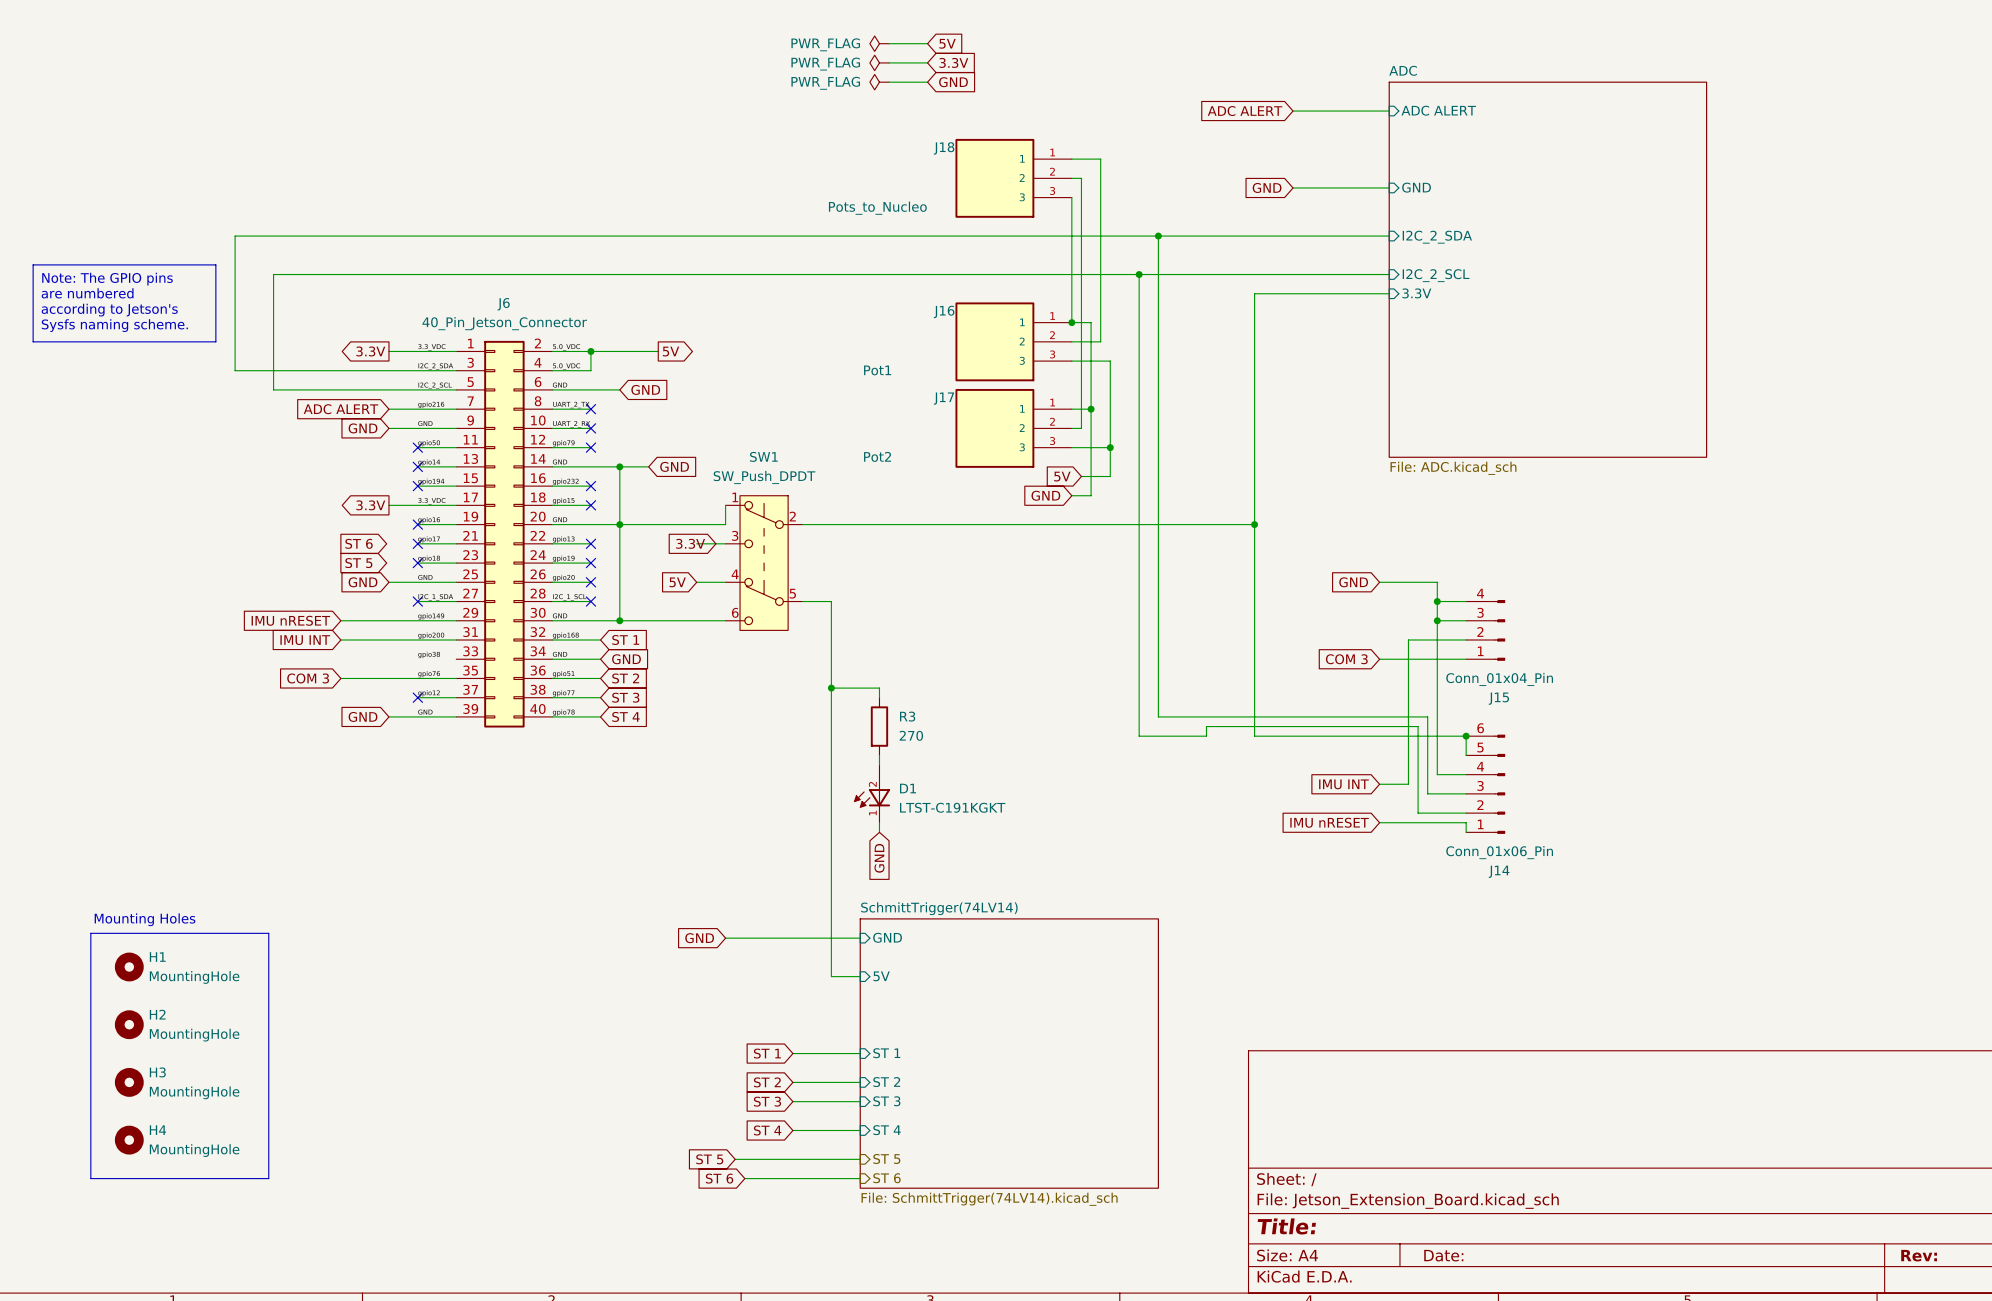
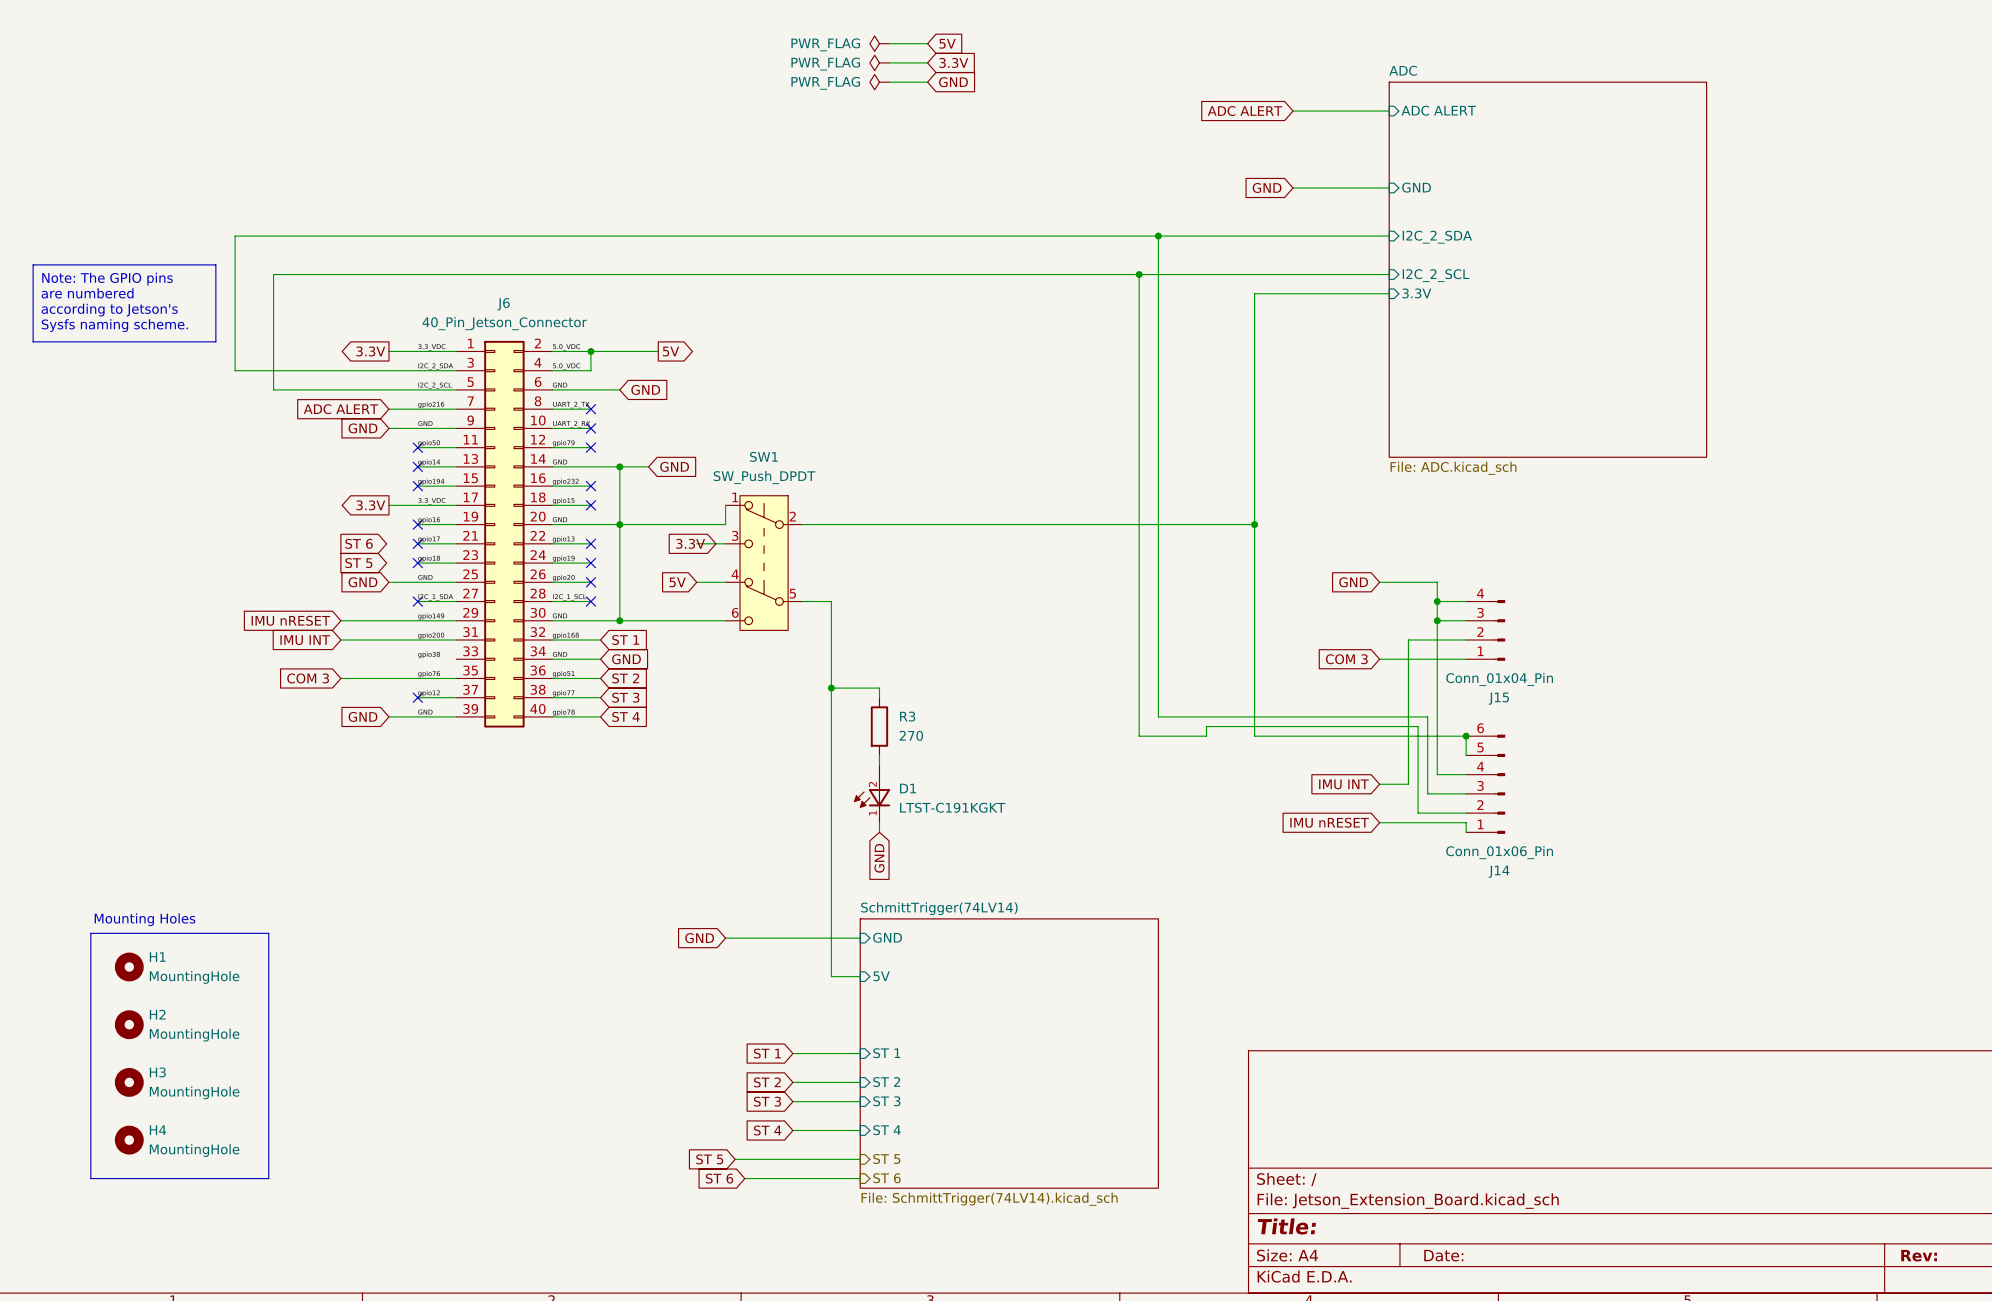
wire: (1071, 159) (1100, 159) (1100, 341) (1071, 341) -> none
J18: Pots_to_Nucleo (1013, 178) -> none
wire: (1071, 178) (1081, 178) (1081, 428) (1071, 428) -> none
wire: (1071, 197) (1071, 322) (1091, 322) (1091, 495) (1071, 495) -> none
junction: (1071, 322) -> none
J16: Pot1 (1013, 341) -> none
wire: (1071, 361) (1110, 361) (1110, 476) (1081, 476) -> none
wire: (1071, 409) (1091, 409) -> none
junction: (1091, 409) -> none
J17: Pot2 (1013, 428) -> none
wire: (1071, 447) (1110, 447) -> none
junction: (1110, 447) -> none
global label: 5V (1062, 476) -> none
global label: GND (1045, 495) -> none

